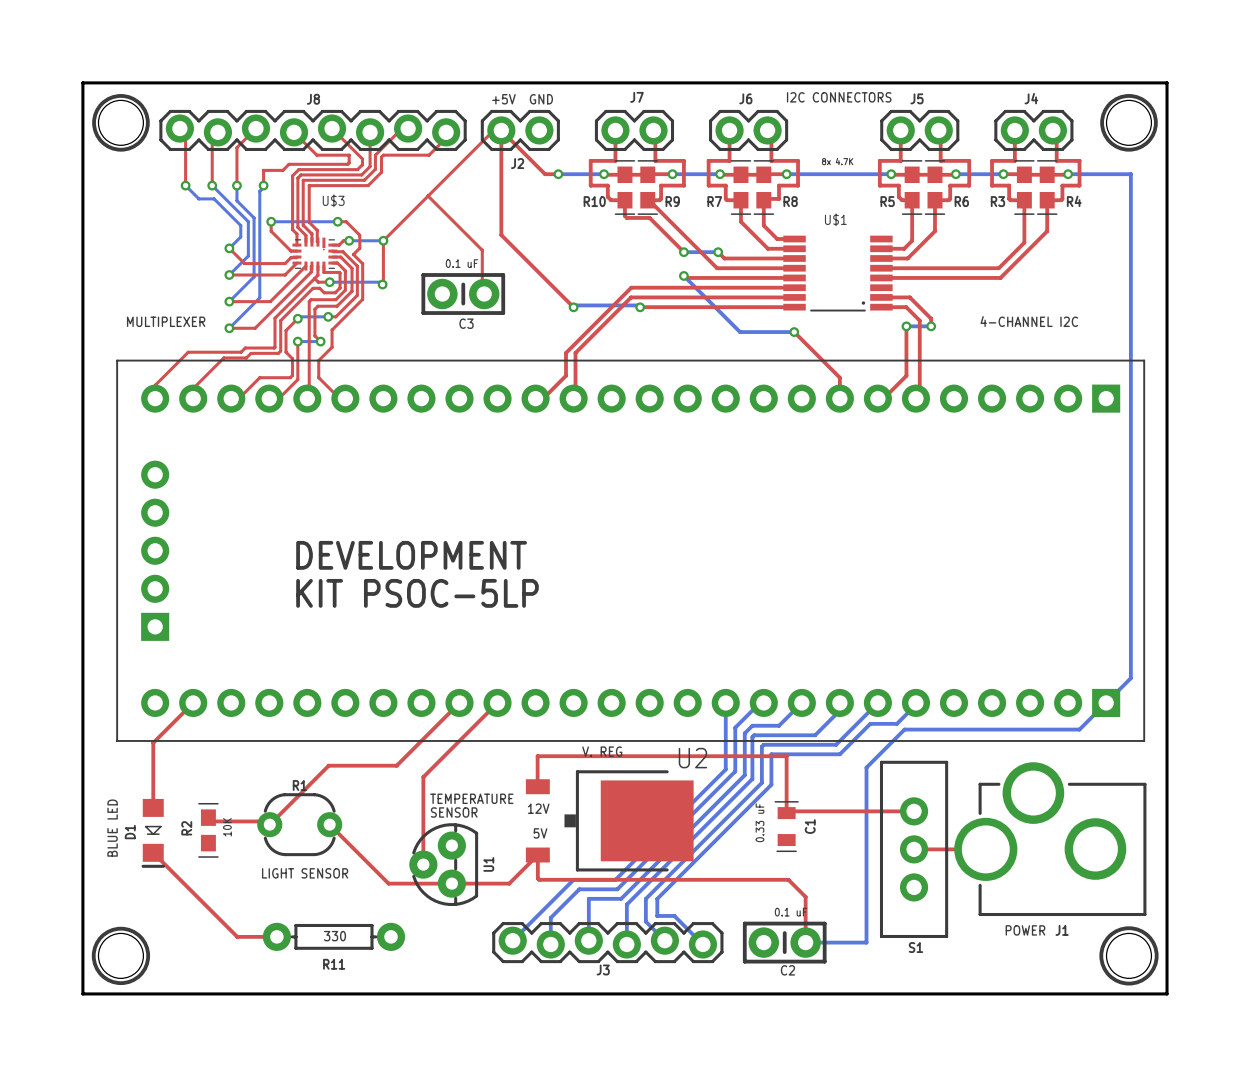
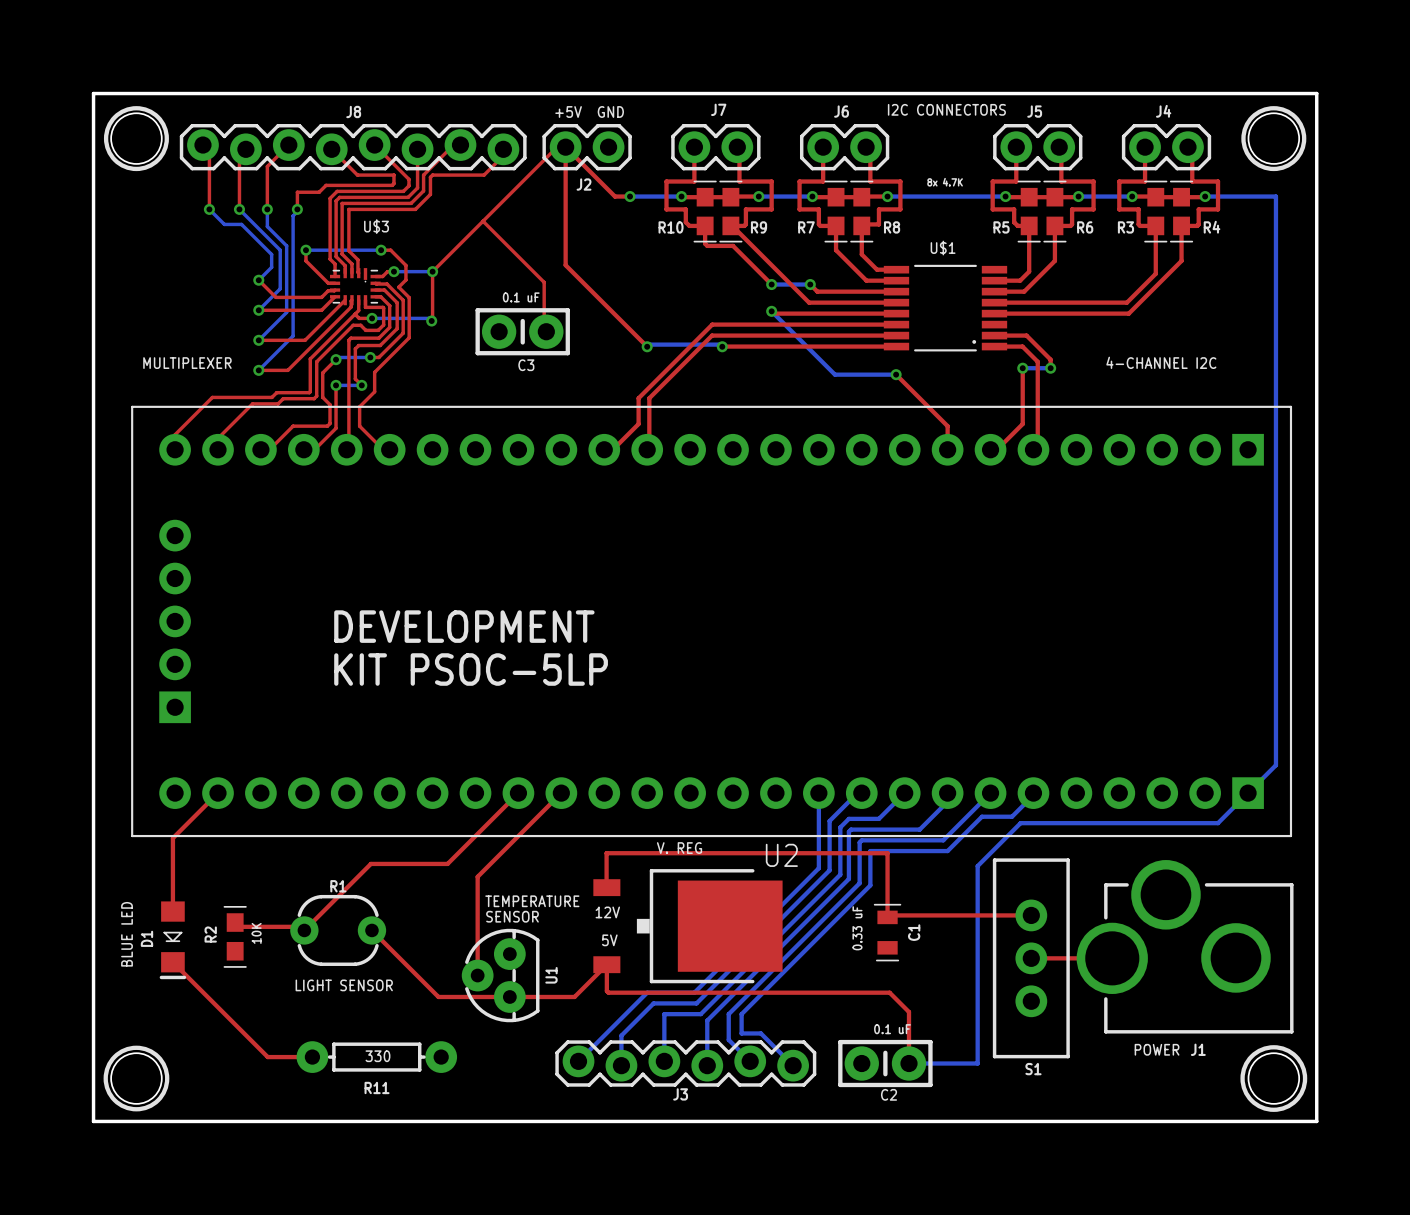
U$1 footprint: [783, 235, 893, 312] -> [883, 264, 1008, 352]

